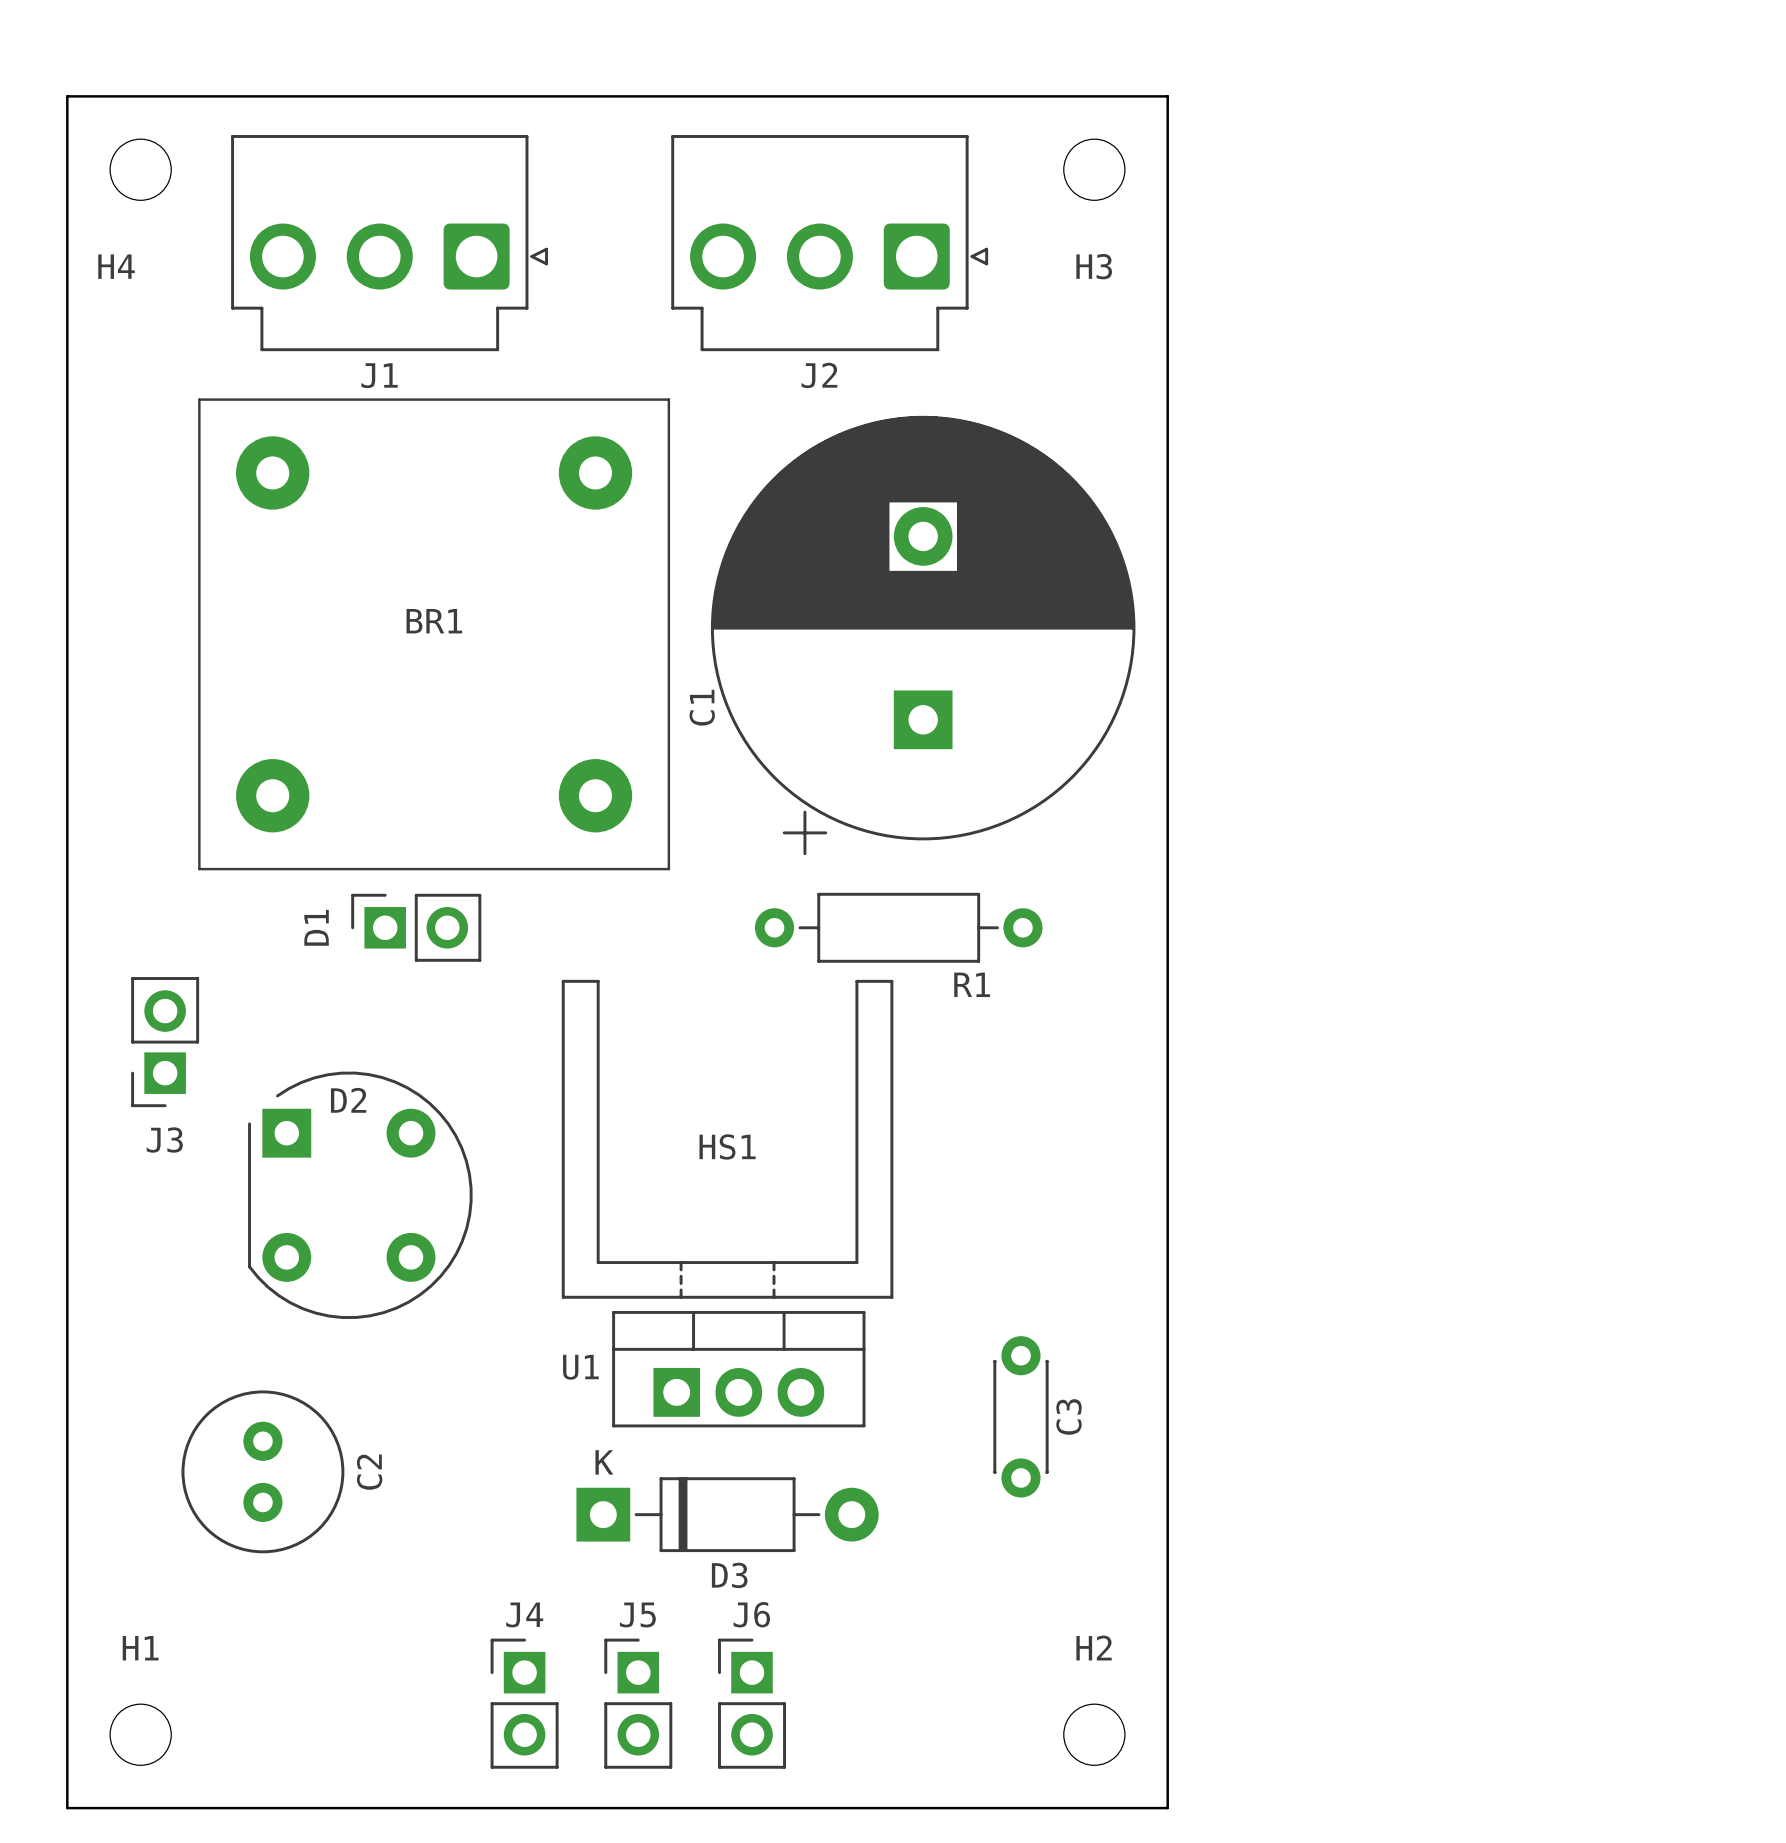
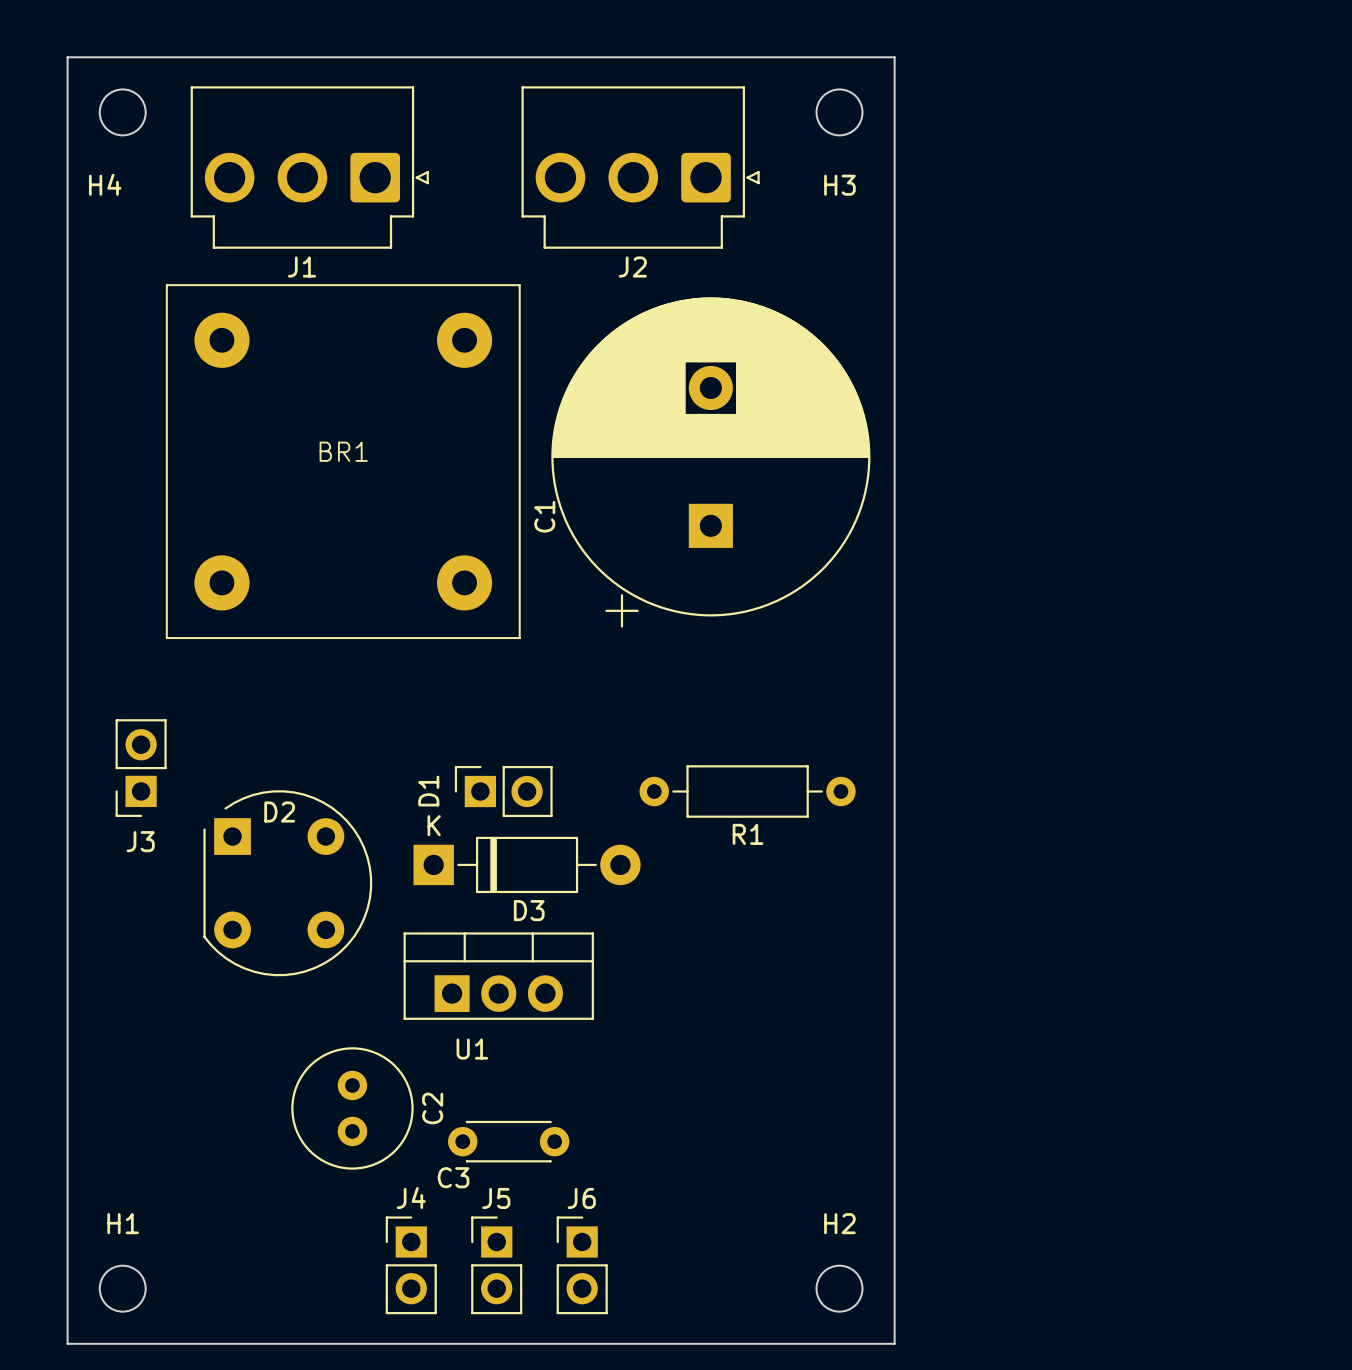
D1 position: (416, 927) -> (503, 791)
R1 position: (898, 927) -> (747, 791)
R1 name position: R1 (972, 984) -> R1 (748, 834)
HS1: (727, 1139) -> none
U1 name position: U1 (580, 1367) -> U1 (472, 1049)
U1 position: (738, 1369) -> (498, 976)
C3 rotation: 0° (1020, 1416) -> 90° clockwise (508, 1141)
C3 position: (1020, 1416) -> (508, 1141)
C3 name position: C3 (1069, 1416) -> C3 (453, 1177)
C2 position: (262, 1471) -> (352, 1108)
D3 position: (727, 1514) -> (527, 864)

